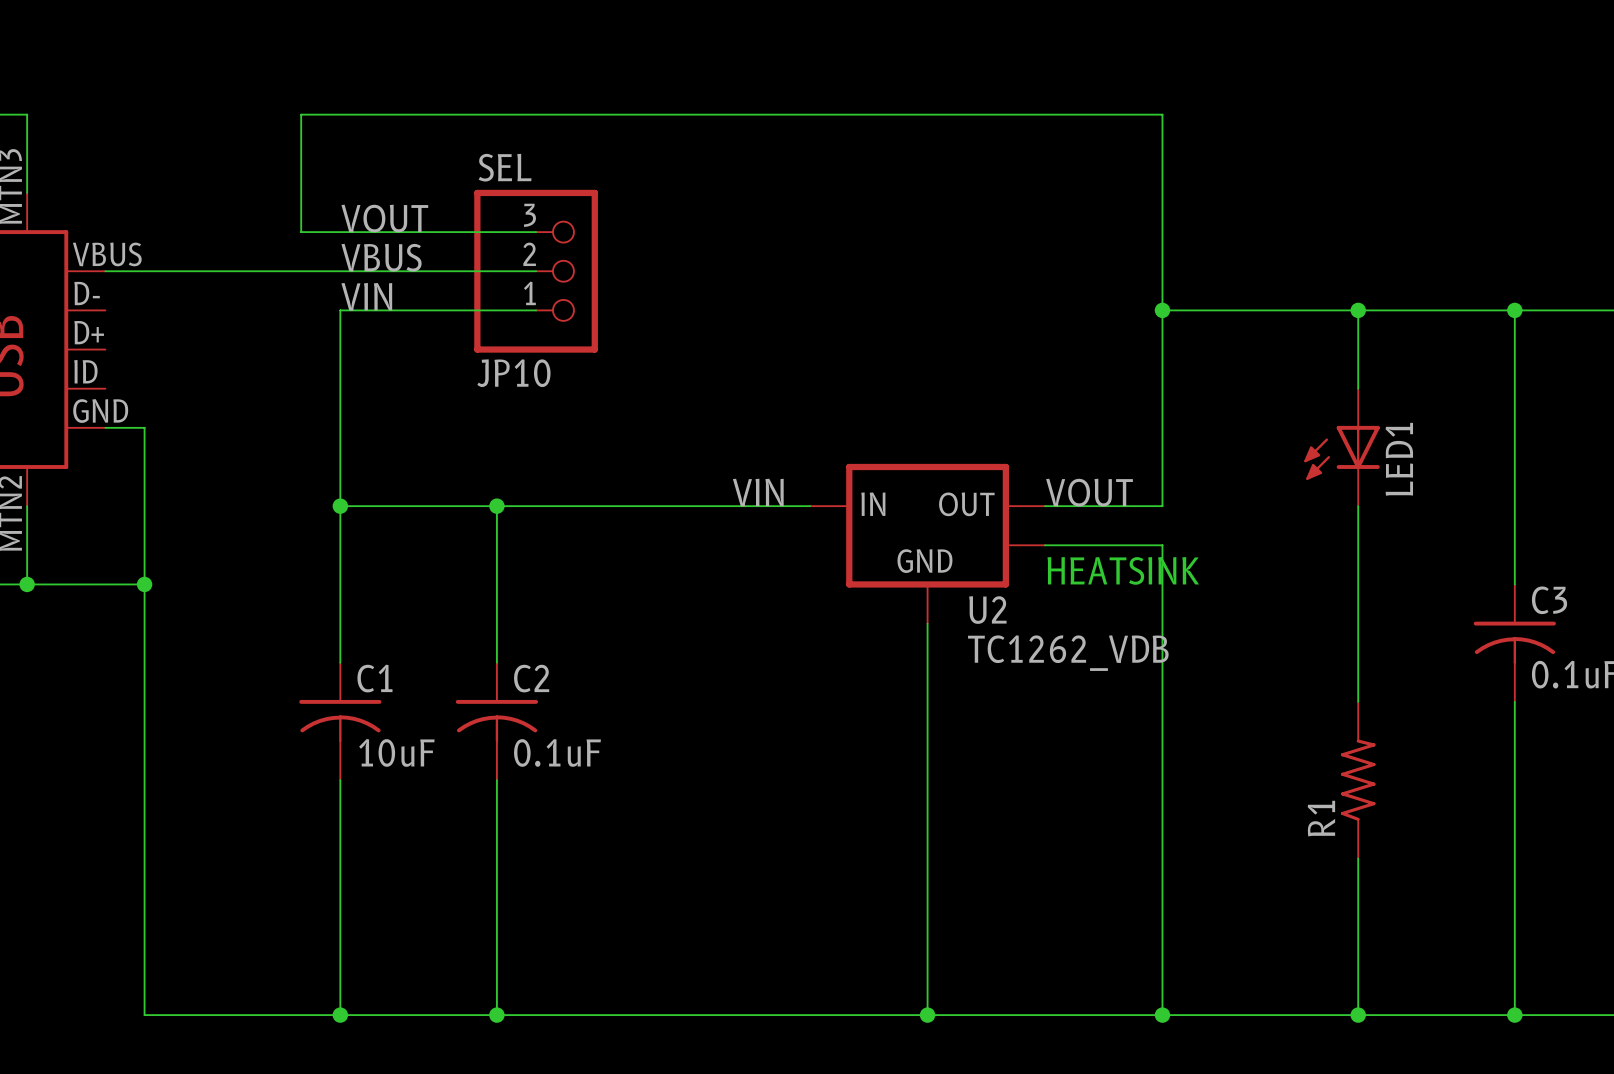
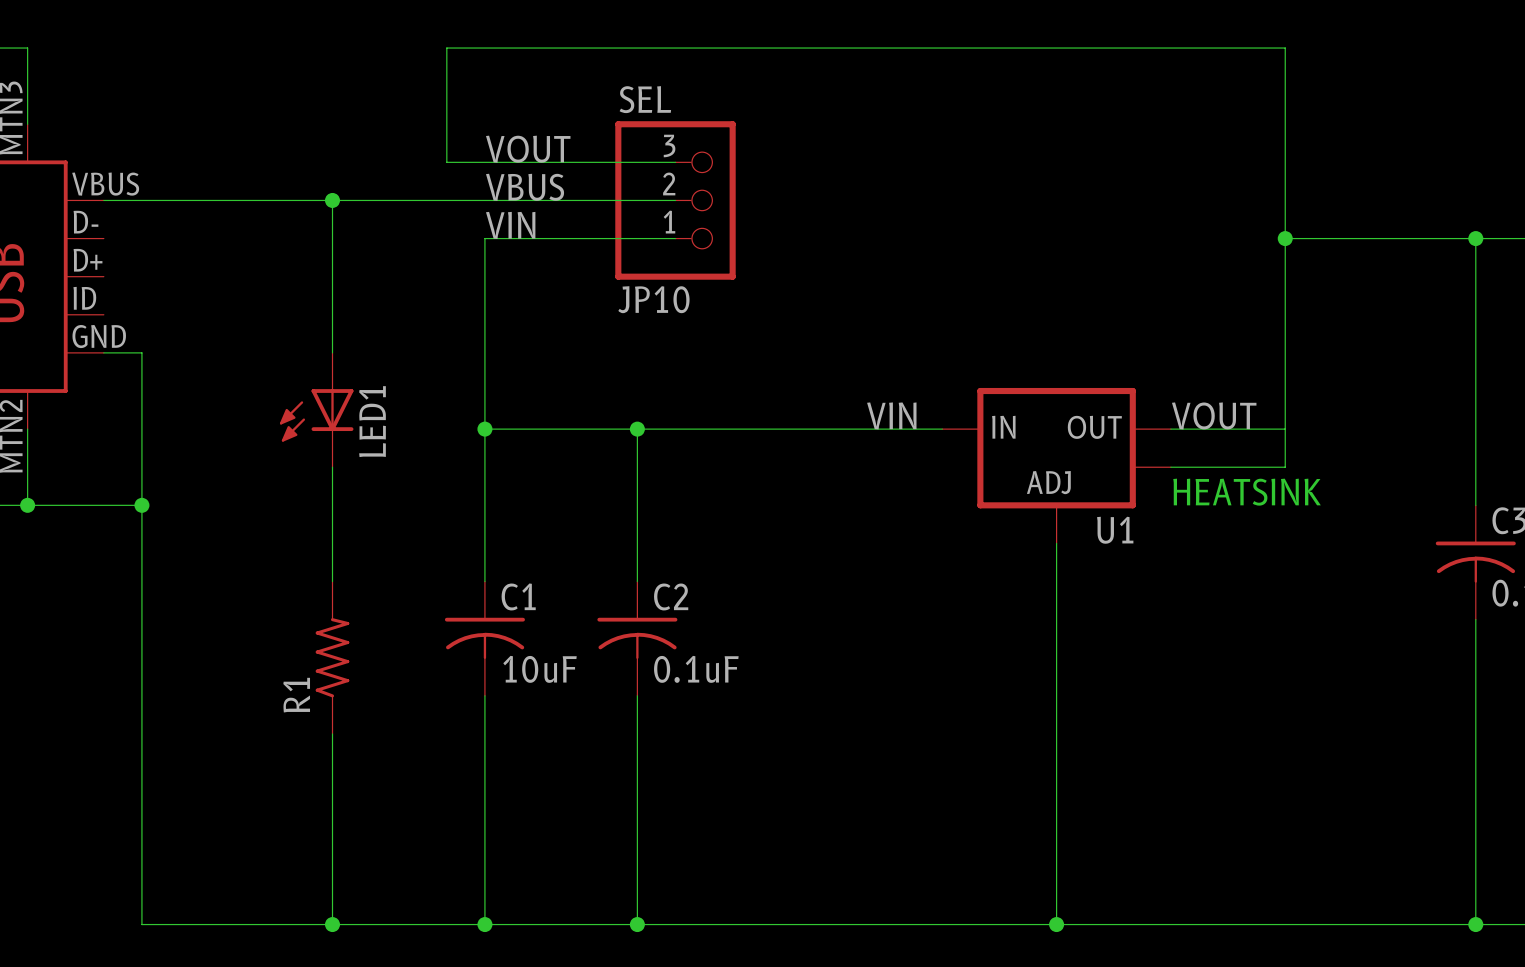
wire: (457, 114) (301, 114) (301, 232) (457, 232) -> (446, 48) (446, 162)
wire: (1162, 114) (1162, 506) (1045, 506) -> (1132, 48) (1285, 48) (1285, 467) (1170, 467)
label position: VOUT (384, 218) -> VOUT (528, 149)
wire: none -> (523, 162) (675, 162)
label position: VBUS (381, 257) -> VBUS (525, 187)
junction: none -> (332, 200)
wire: none -> (523, 200) (675, 200)
JP10 position: (536, 271) -> (675, 200)
label: VIN (366, 296) -> none
label: none -> VIN (510, 225)
wire: (340, 310) (496, 310) -> (332, 238) (332, 200)
wire: none -> (523, 238) (675, 238)
wire: (1162, 310) (1319, 310) -> none
junction: (1162, 310) -> none
wire: (1358, 310) (1358, 388) -> none
junction position: (1358, 310) -> (1285, 238)
LED1 position: (1341, 447) -> (316, 410)
label: VIN (758, 492) -> none
label: none -> VIN (891, 415)
label position: VOUT (1089, 492) -> VOUT (1214, 415)
wire: (340, 506) (496, 506) -> (484, 238) (484, 429)
junction: (340, 506) -> none
wire: none -> (637, 429) (637, 581)
junction: none -> (637, 429)
wire: none -> (789, 429) (942, 429)
wire: none -> (1170, 429) (1285, 429)
wire: (1358, 506) (1358, 701) -> none
U2: TC1262_VDB (927, 543) -> none
U1: none -> (1056, 465)
wire: (1045, 545) (1162, 545) (1162, 1015) -> none
text position: HEATSINK (1123, 570) -> HEATSINK (1247, 492)
wire: (927, 623) (927, 1015) -> (1056, 543) (1056, 924)
C2 name: C2 (531, 678) -> C1 (518, 596)
C1: 10uF (340, 721) -> none
C2: none -> 0.1uF (637, 638)
C2 value: 0.1uF (557, 752) -> 10uF (540, 669)
wire: none -> (637, 695) (637, 924)
R1 position: (1358, 780) -> (332, 657)
wire: (1358, 858) (1358, 1015) -> none
junction: none -> (637, 924)
junction: (927, 1015) -> none
junction: none -> (1056, 924)
junction: (1162, 1015) -> none
junction: (1358, 1015) -> none

